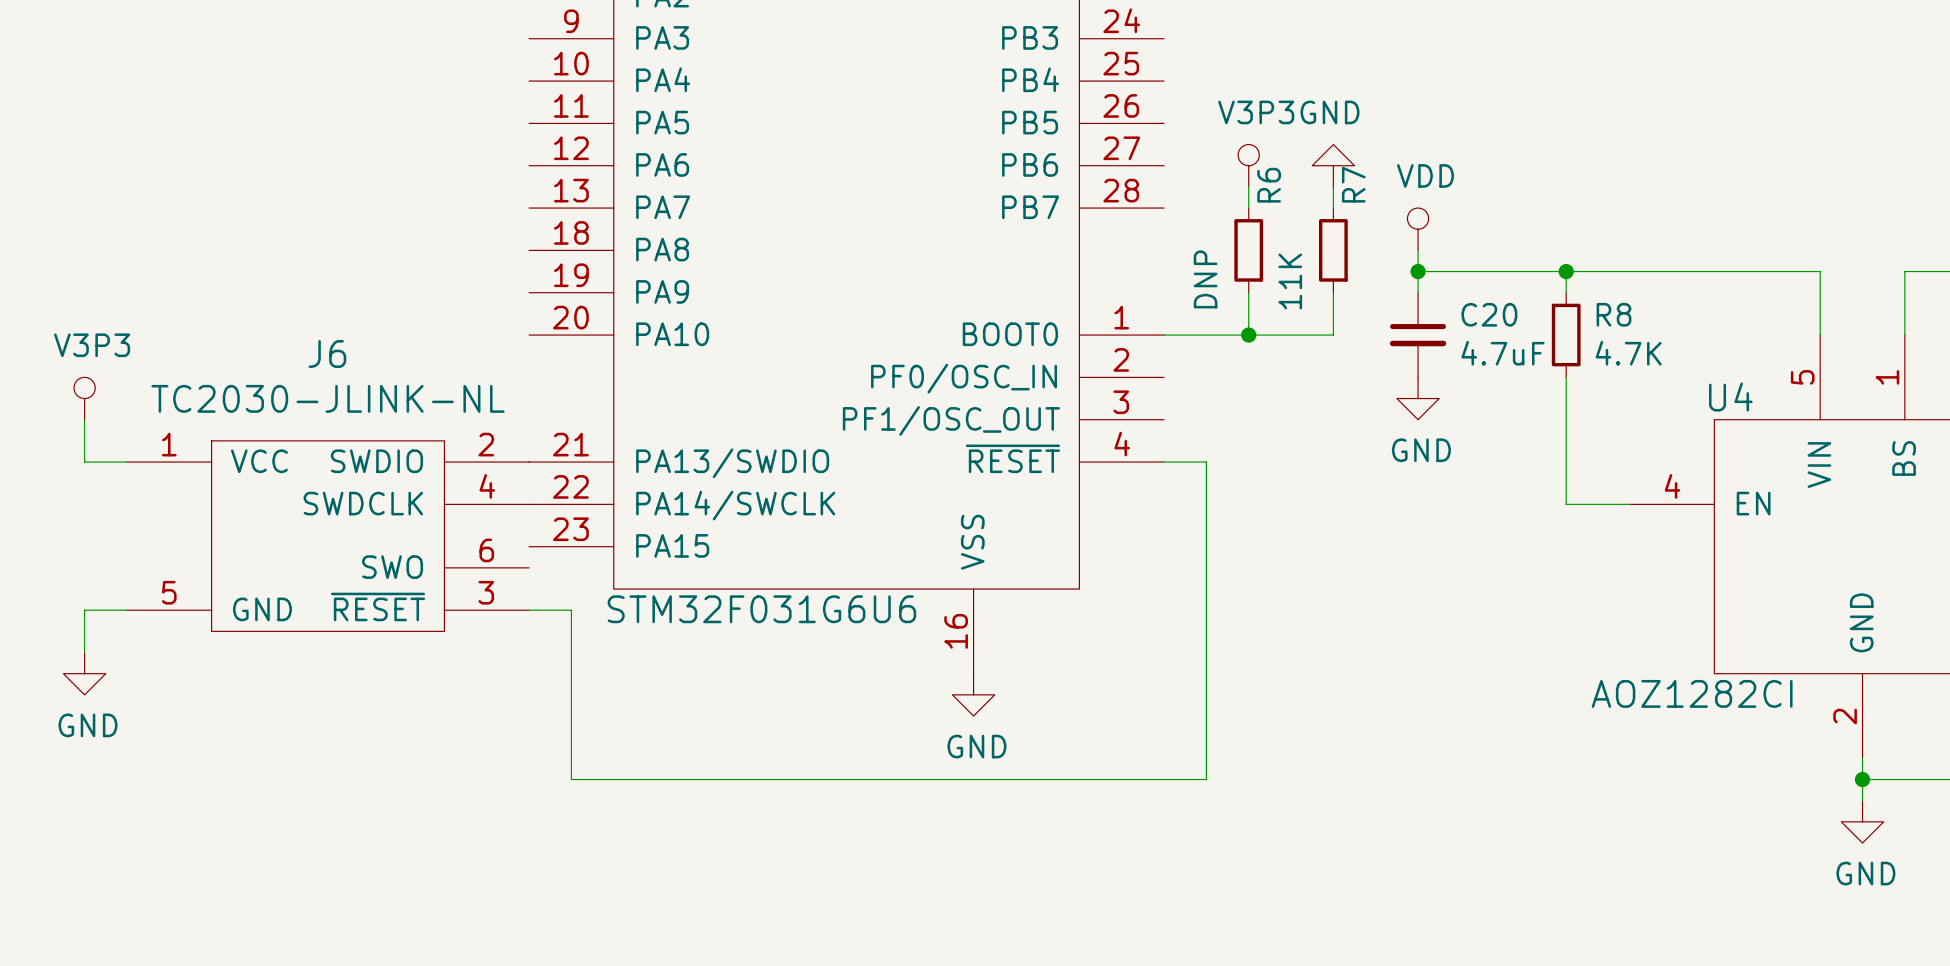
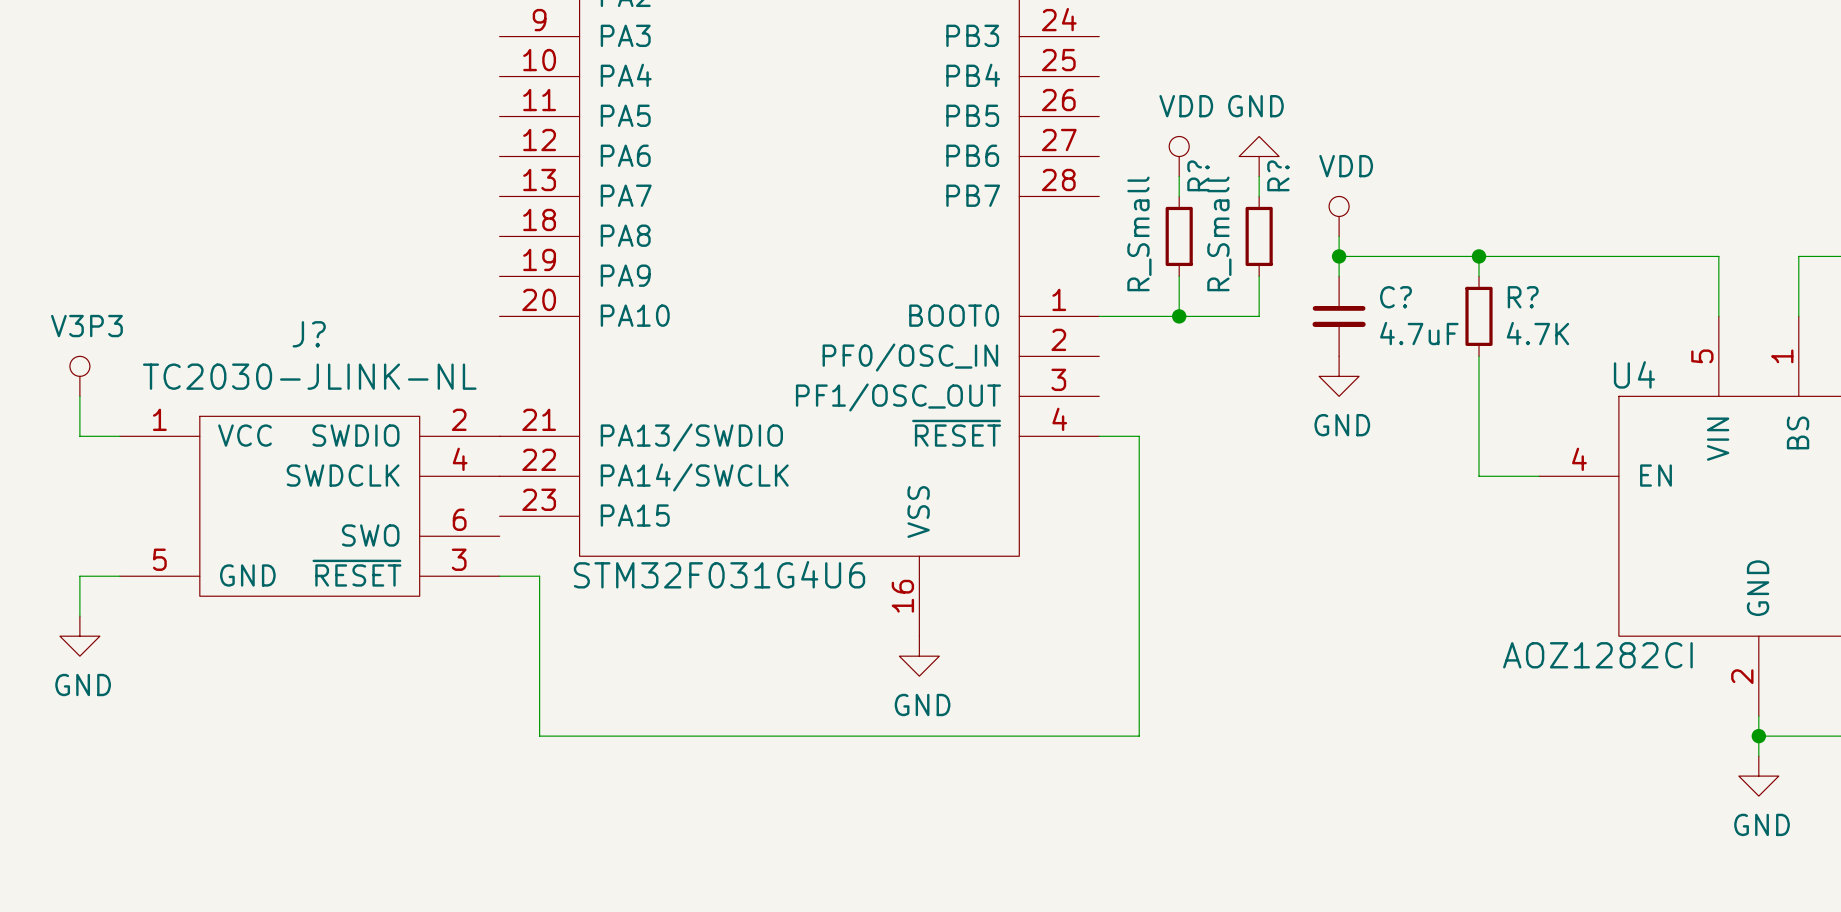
power symbol: V3P3 (1248, 165) -> VDD (1179, 156)
R7 name: R7 (1353, 184) -> R? (1278, 175)
R6 name: R6 (1269, 185) -> R? (1198, 175)
R6 value: DNP (1205, 279) -> R_Small (1139, 233)
R7 value: 11K (1290, 281) -> R_Small (1219, 233)
C20 name: C20 (1489, 314) -> C? (1396, 297)
R8 name: R8 (1614, 314) -> R? (1523, 297)
J6 name: J6 (327, 353) -> J? (309, 334)
part value: STM32F031G6U6 (761, 609) -> STM32F031G4U6 (719, 574)

